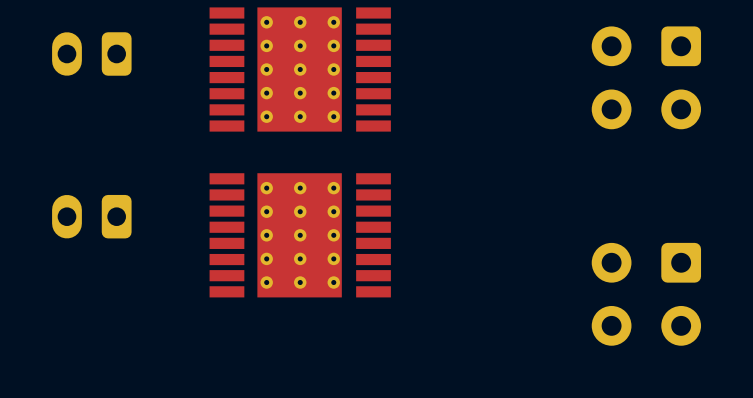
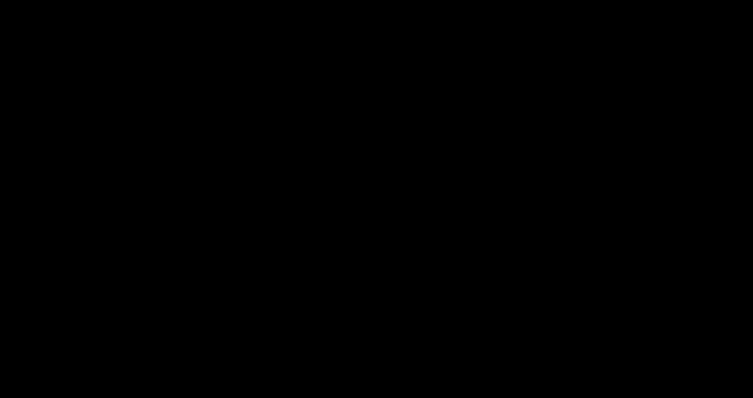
part: (91, 53) -> none
part: (300, 69) -> none
part: (646, 77) -> none
part: (91, 216) -> none
part: (300, 235) -> none
part: (646, 294) -> none

